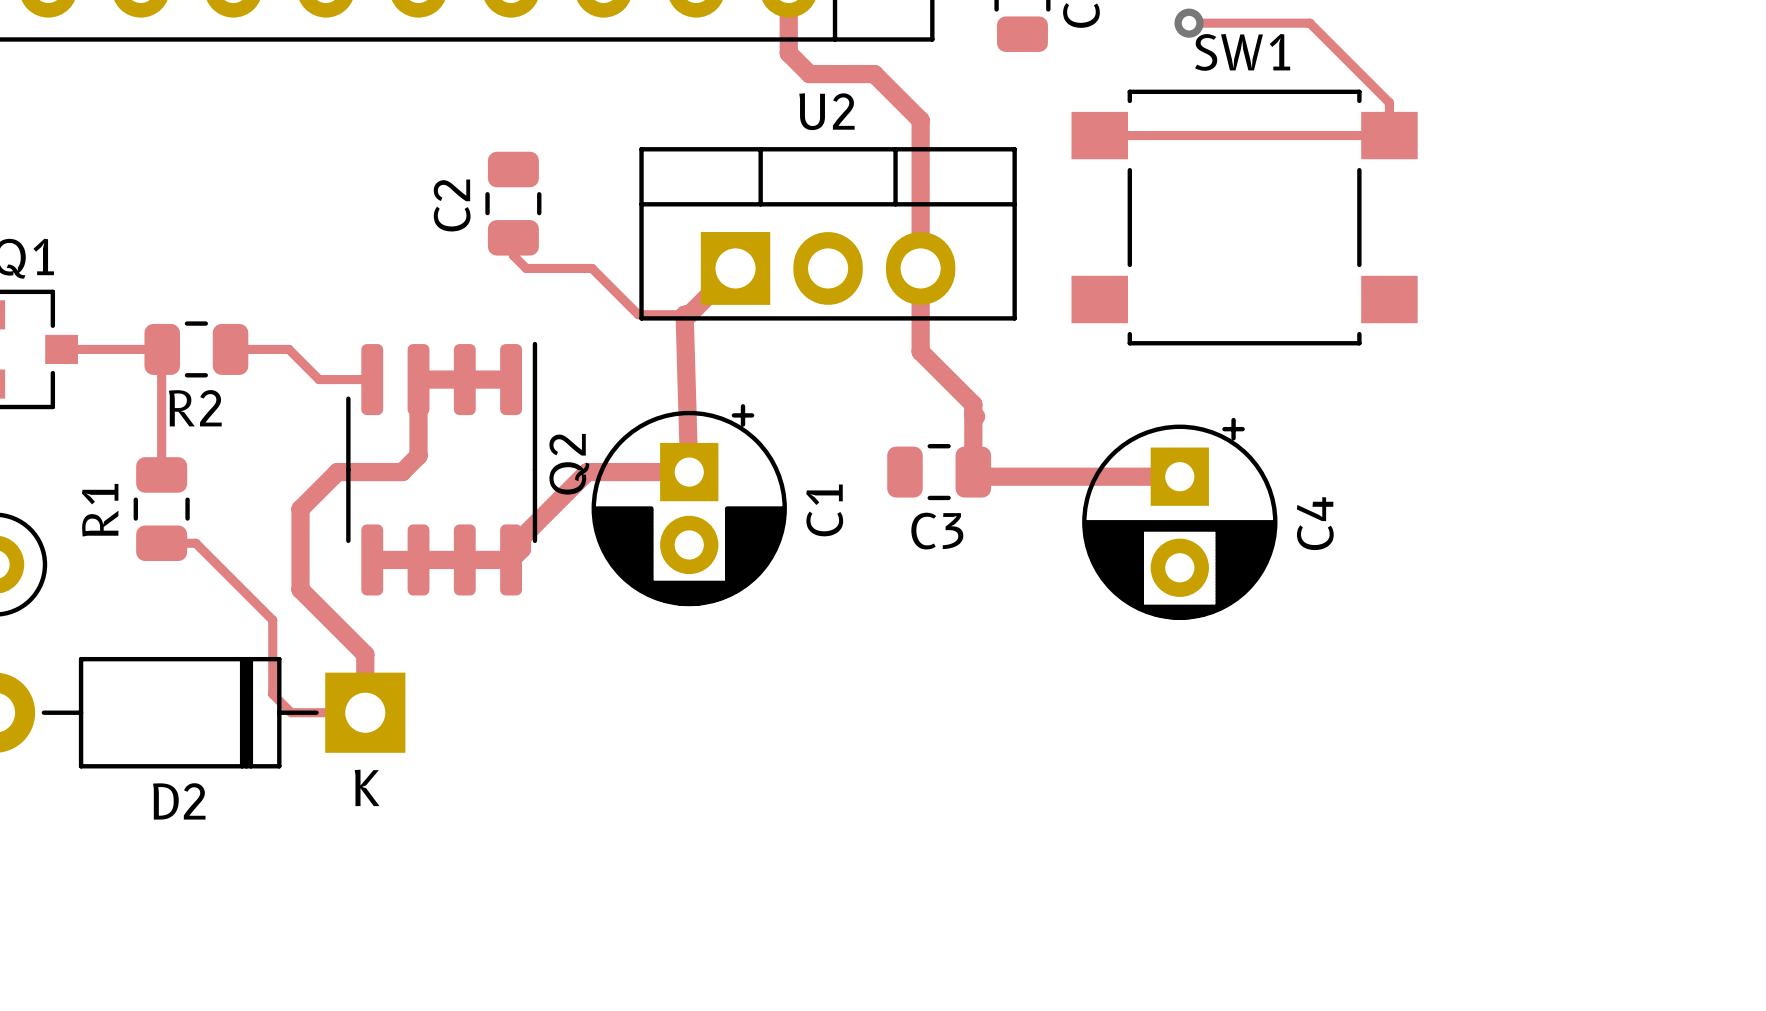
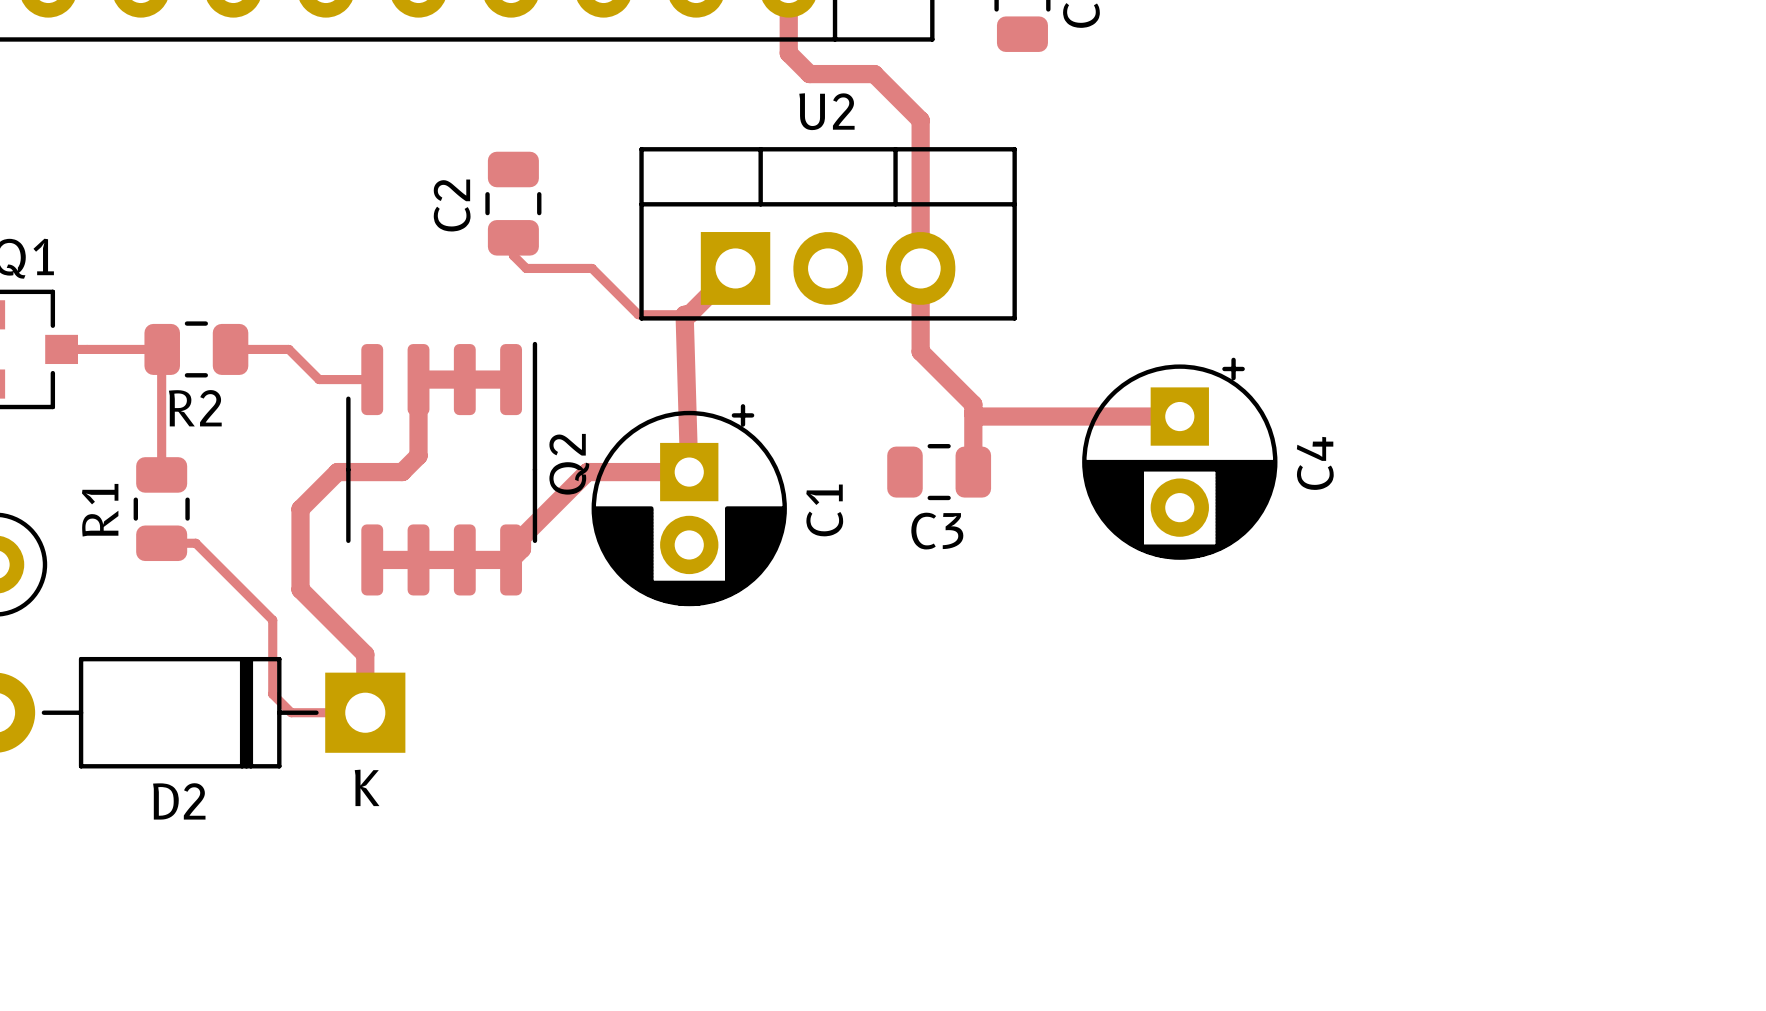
track: (1189, 23) (1309, 23) (1389, 102) (1389, 135) (1099, 135) -> none
via: (1189, 23) -> none
SW1: (1244, 217) -> none
track: none -> (976, 416) (1179, 416)
track: (973, 472) (977, 476) (1179, 476) -> none
C4 position: (1179, 518) -> (1179, 458)

